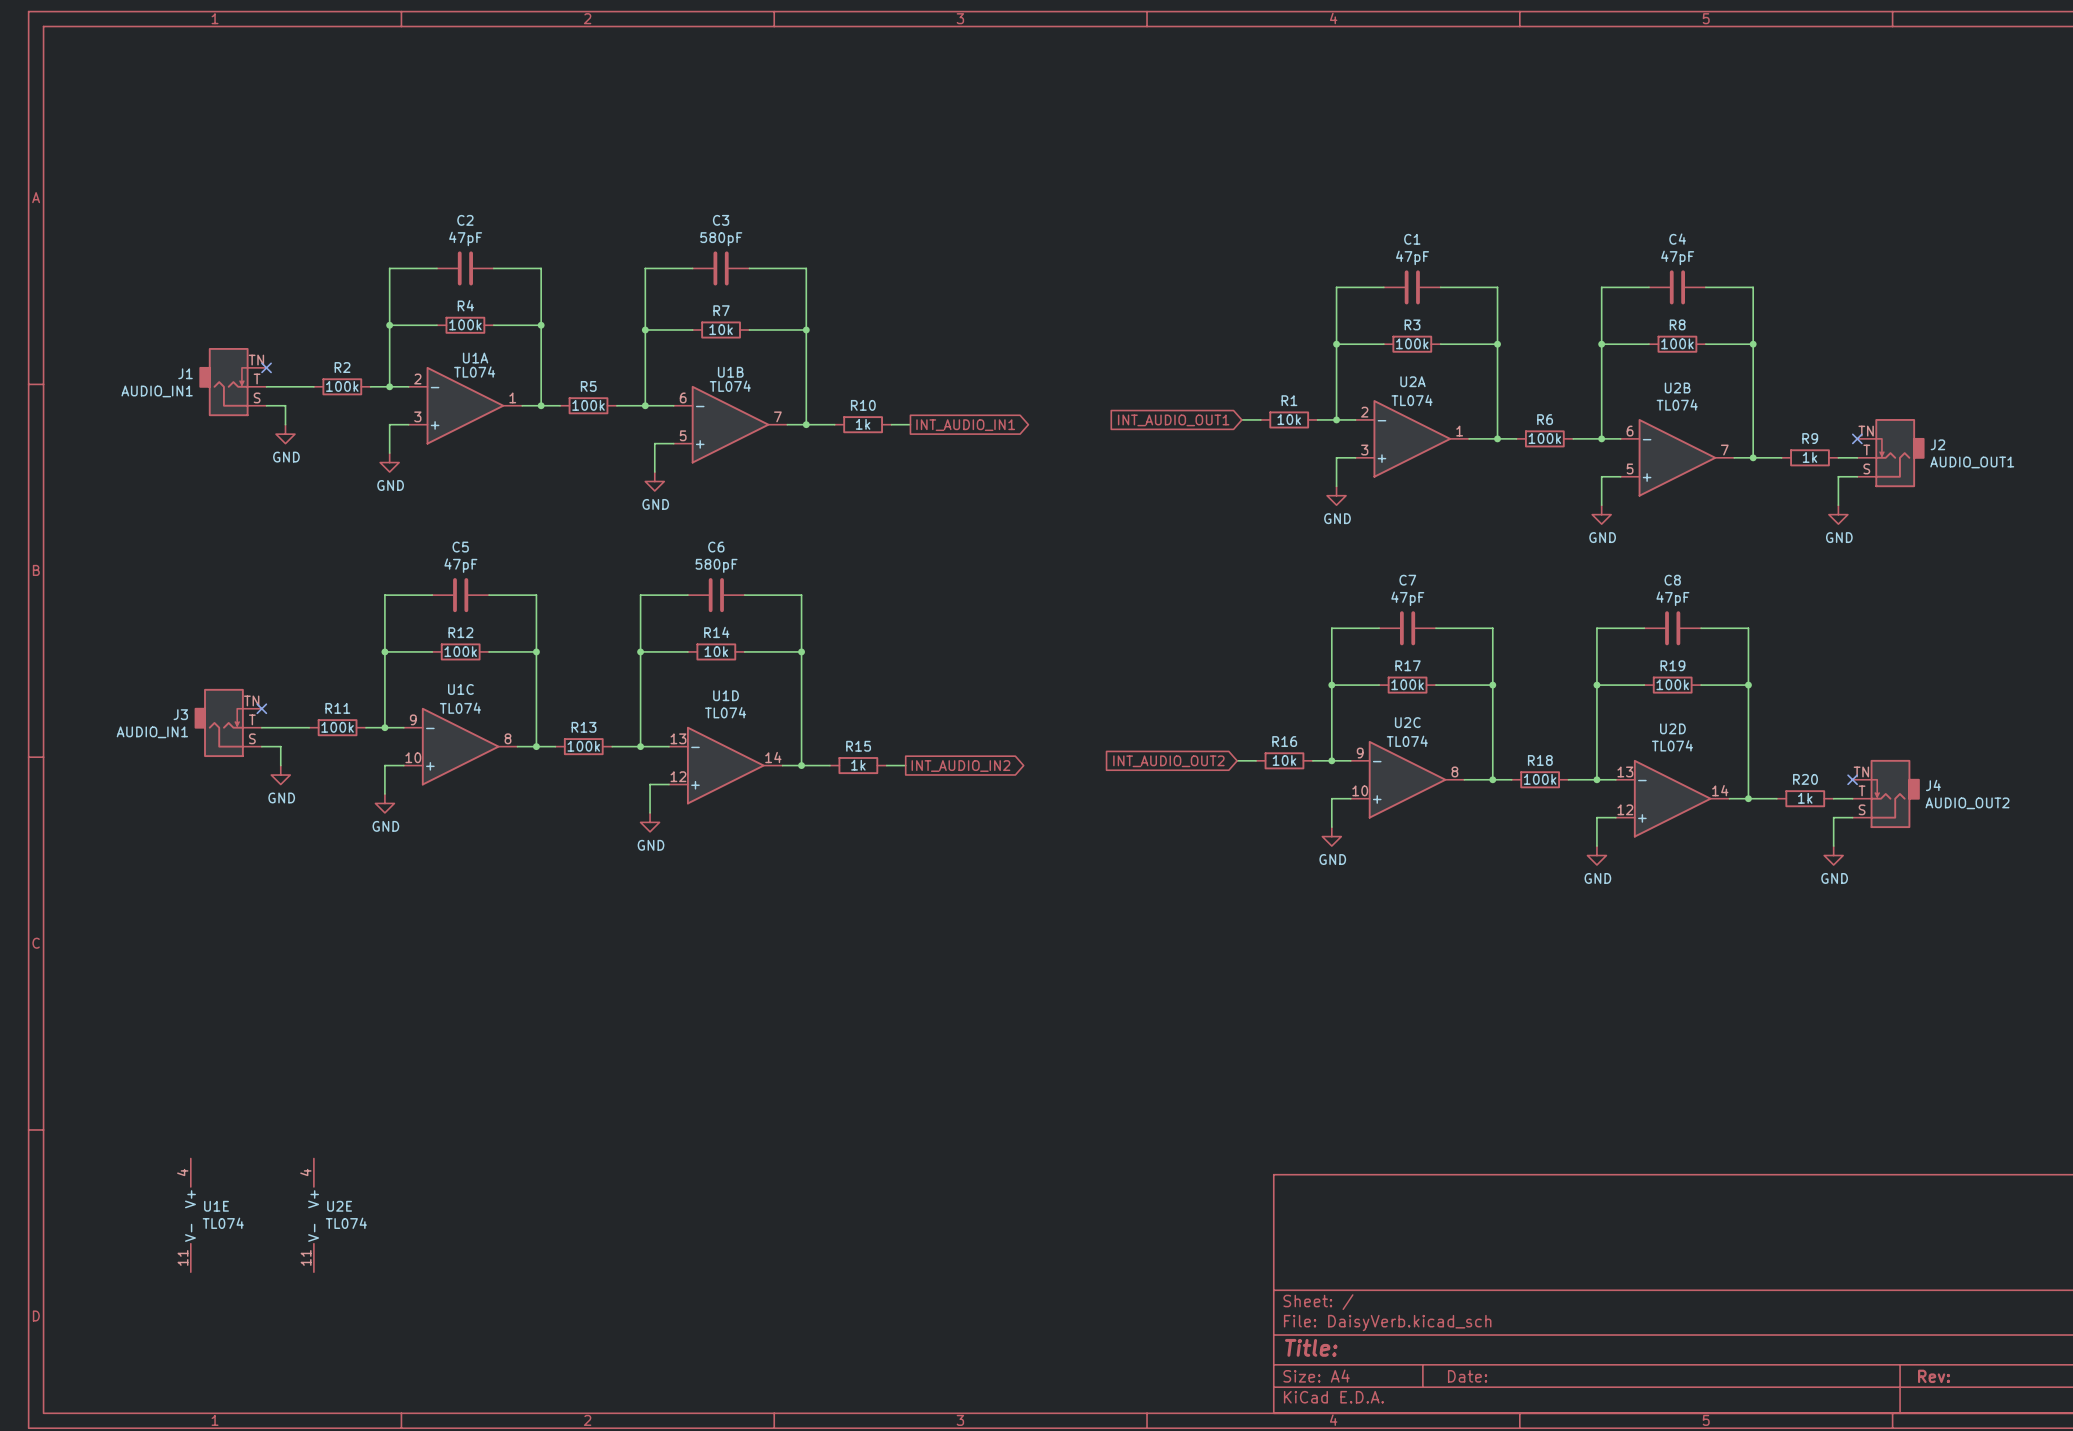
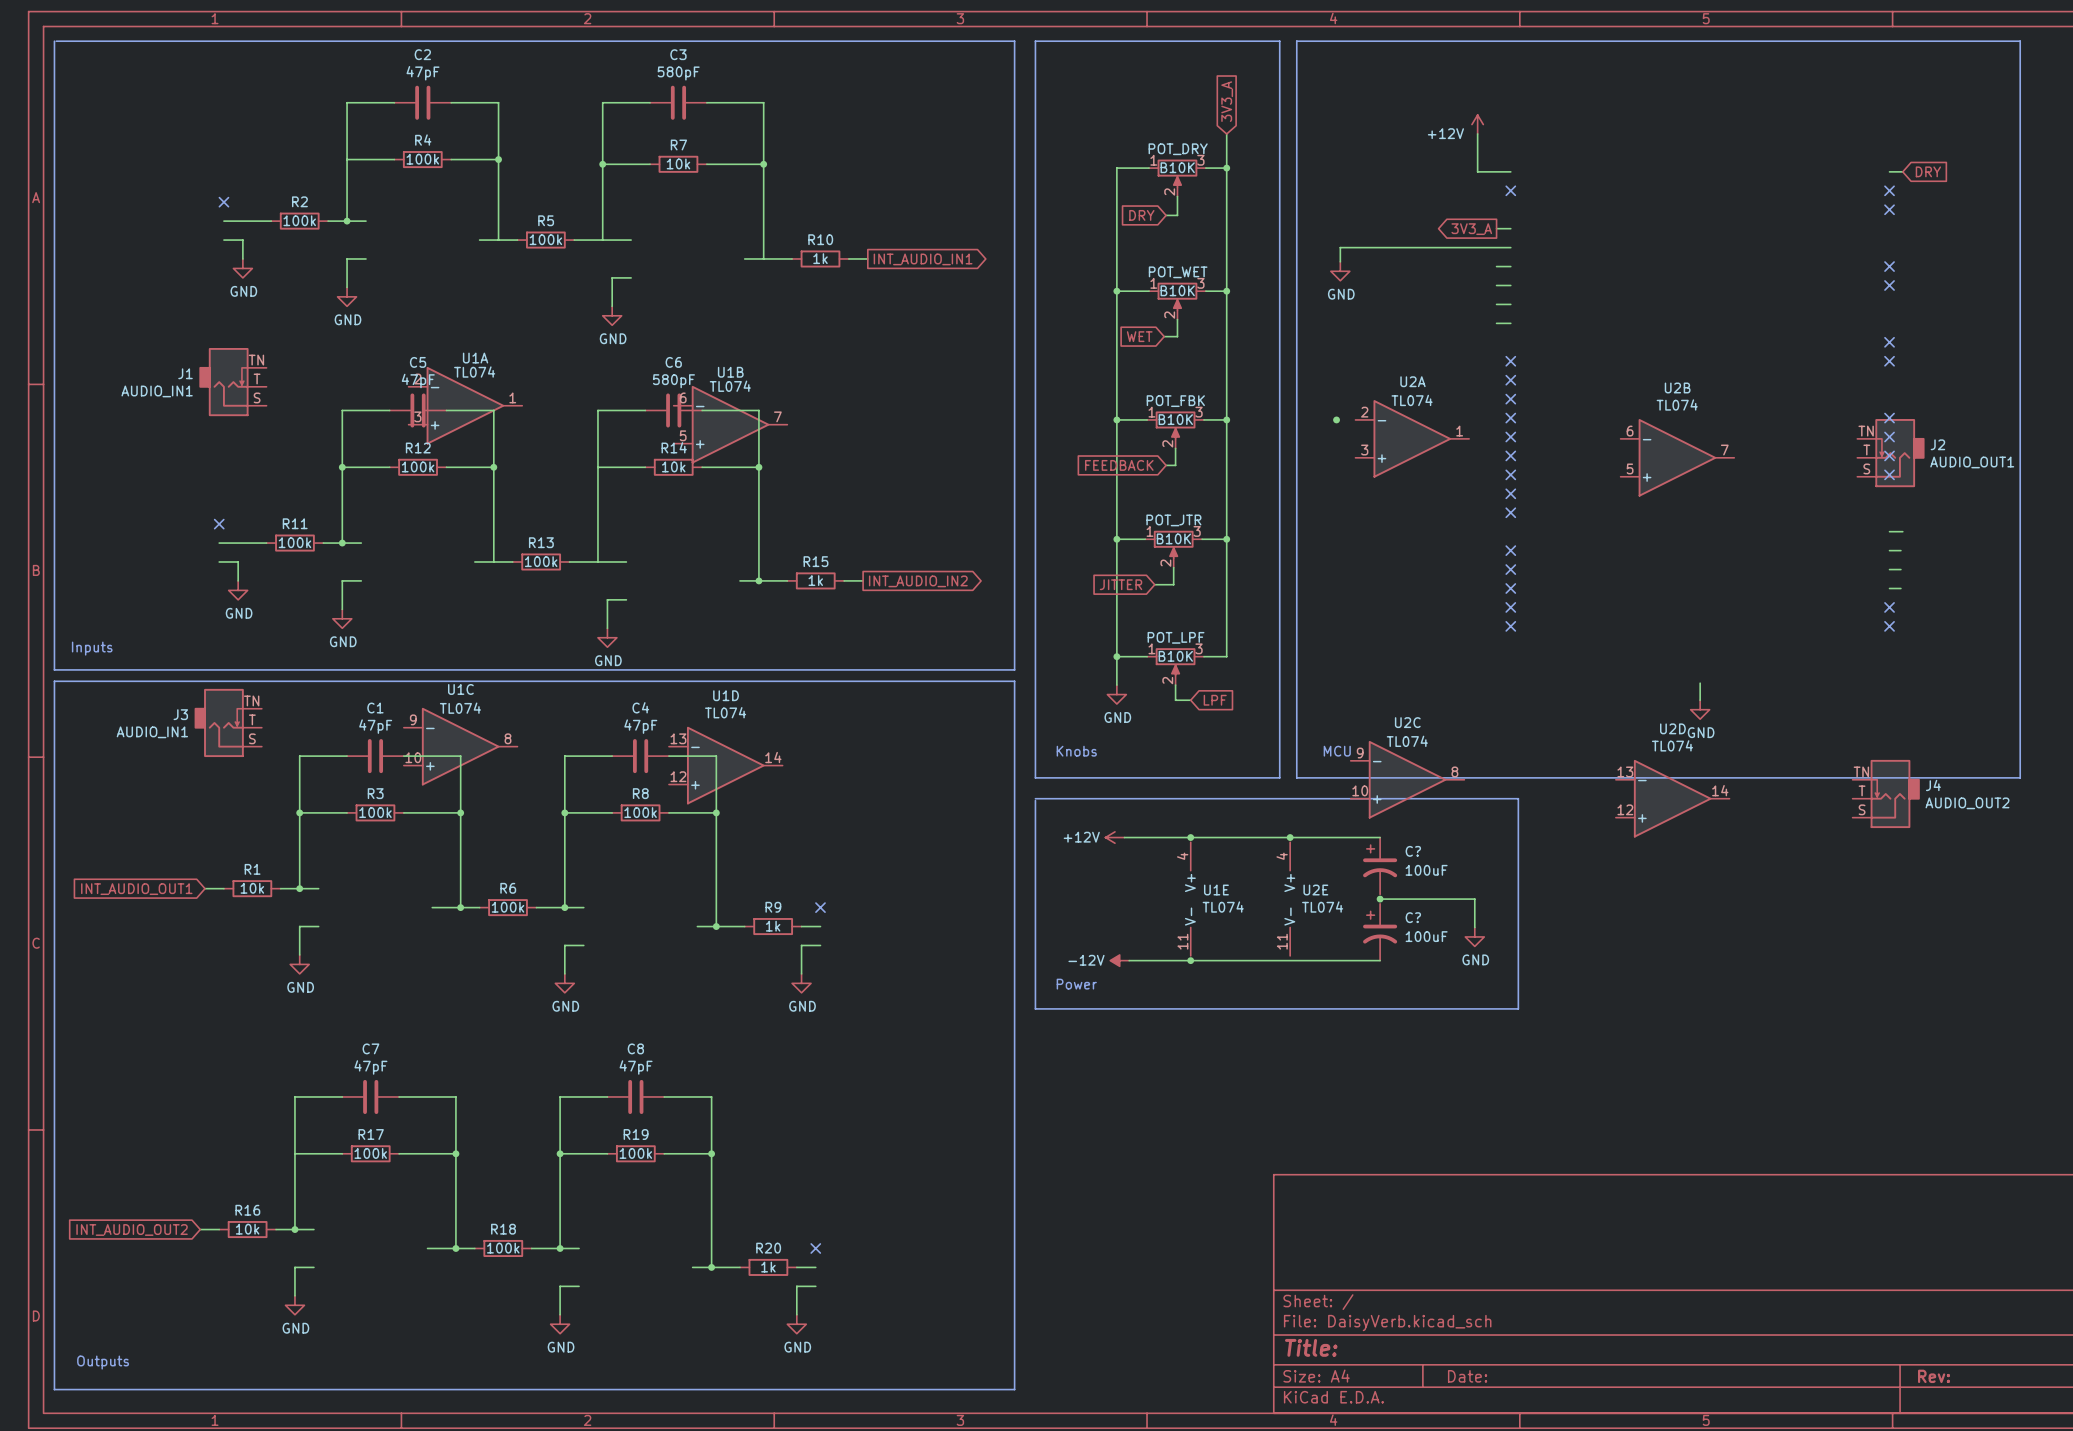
line: none -> (54, 41) (54, 669) (1014, 669) (1014, 41) (56, 41)
line: none -> (1035, 41) (1279, 41) (1279, 777) (1035, 777) (1035, 41)
line: none -> (1296, 41) (2020, 41) (2020, 777) (1296, 777) (1296, 41)
global label: none -> 3V3_A (1227, 101)
power symbol: none -> +12V (1477, 124)
wire: none -> (1226, 133) (1226, 656) (1203, 656)
wire: none -> (1477, 133) (1477, 171) (1510, 171)
junction: none -> (498, 159)
junction: none -> (602, 164)
junction: none -> (763, 164)
wire: none -> (1149, 168) (1116, 168) (1116, 685)
wire: none -> (1205, 168) (1226, 168)
junction: none -> (1226, 168)
wire: none -> (1889, 171) (1902, 171)
global label: none -> DRY (1928, 171)
POT_DRY: none -> B10K (1177, 178)
no-connect mark: none -> (1510, 190)
no-connect mark: none -> (1889, 190)
wire: none -> (1177, 196) (1177, 215) (1166, 215)
no-connect mark: none -> (223, 202)
no-connect mark: none -> (1889, 209)
global label: none -> DRY (1141, 215)
junction: none -> (347, 221)
wire: none -> (1496, 228) (1510, 228)
global label: none -> 3V3_A (1471, 229)
wire: none -> (1510, 247) (1340, 247) (1340, 261)
wire: none -> (1496, 266) (1510, 266)
no-connect mark: none -> (1889, 266)
power symbol: none -> GND (242, 268)
wire: (437, 268) (389, 268) (389, 386) -> (394, 102) (347, 102) (347, 221)
C2 position: (465, 268) -> (422, 102)
wire: (493, 268) (541, 268) (541, 405) -> (451, 102) (498, 102) (498, 240)
wire: (692, 268) (645, 268) (645, 405) -> (650, 102) (602, 102) (602, 240)
C3 position: (721, 268) -> (678, 102)
wire: (749, 268) (806, 268) (806, 424) -> (706, 102) (763, 102) (763, 258)
power symbol: none -> GND (1340, 271)
wire: none -> (1496, 285) (1510, 285)
no-connect mark: none -> (1889, 285)
wire: (1383, 287) (1336, 287) (1336, 419) -> none
C1 position: (1412, 287) -> (375, 756)
wire: (1440, 287) (1497, 287) (1497, 438) -> none
wire: (1649, 287) (1601, 287) (1601, 438) -> none
C4 position: (1677, 287) -> (640, 756)
wire: (1705, 287) (1753, 287) (1753, 457) -> none
wire: none -> (1116, 291) (1149, 291)
junction: none -> (1116, 291)
wire: none -> (1205, 291) (1226, 291)
junction: none -> (1226, 291)
power symbol: none -> GND (347, 296)
POT_WET: none -> B10K (1177, 301)
wire: none -> (1496, 304) (1510, 304)
power symbol: none -> GND (612, 315)
wire: none -> (1177, 319) (1177, 336) (1164, 336)
wire: none -> (1496, 323) (1510, 323)
wire: (389, 325) (437, 325) -> (347, 159) (394, 159)
junction: (389, 325) -> none
R4 position: (465, 325) -> (422, 159)
wire: (493, 325) (541, 325) -> (451, 159) (498, 159)
junction: (541, 325) -> none
wire: (645, 330) (692, 330) -> (602, 164) (650, 164)
junction: (645, 330) -> none
R7 position: (721, 330) -> (678, 164)
wire: (749, 330) (806, 330) -> (706, 164) (763, 164)
junction: (806, 330) -> none
global label: none -> WET (1139, 336)
no-connect mark: none -> (1889, 342)
wire: (1336, 344) (1383, 344) -> none
junction: (1336, 344) -> none
R3 position: (1412, 344) -> (375, 812)
wire: (1440, 344) (1497, 344) -> none
junction: (1497, 344) -> none
wire: (1601, 344) (1649, 344) -> none
junction: (1601, 344) -> none
R8 position: (1677, 344) -> (640, 812)
wire: (1705, 344) (1753, 344) -> none
junction: (1753, 344) -> none
no-connect mark: none -> (1510, 361)
no-connect mark: none -> (1889, 361)
no-connect mark: (266, 367) -> none
no-connect mark: none -> (1510, 380)
wire: (266, 386) (313, 386) -> (223, 221) (271, 221)
R2 position: (342, 386) -> (299, 221)
wire: (370, 386) (408, 386) -> (328, 221) (365, 221)
junction: (389, 386) -> none
no-connect mark: none -> (1510, 399)
wire: (266, 405) (285, 405) (285, 424) -> (223, 240) (242, 240) (242, 258)
wire: (522, 405) (560, 405) -> (479, 240) (517, 240)
junction: (541, 405) -> none
R5 position: (588, 405) -> (545, 240)
wire: (616, 405) (673, 405) -> (574, 240) (631, 240)
junction: (645, 405) -> none
wire: none -> (389, 410) (342, 410) (342, 543)
wire: none -> (446, 410) (493, 410) (493, 561)
wire: none -> (645, 410) (597, 410) (597, 561)
wire: none -> (702, 410) (758, 410) (758, 580)
no-connect mark: none -> (1510, 418)
no-connect mark: none -> (1889, 418)
wire: none -> (1116, 419) (1147, 419)
junction: none -> (1116, 419)
wire: none -> (1203, 419) (1226, 419)
junction: none -> (1226, 419)
wire: (1241, 419) (1260, 419) -> none
R1 position: (1289, 419) -> (252, 888)
wire: (1317, 419) (1355, 419) -> none
global label: INT_AUDIO_OUT1 (1173, 420) -> none
wire: (408, 424) (389, 424) (389, 453) -> (365, 258) (347, 258) (347, 287)
wire: (787, 424) (834, 424) -> (744, 258) (792, 258)
junction: (806, 424) -> none
R10 position: (863, 424) -> (820, 258)
wire: (891, 424) (910, 424) -> (848, 258) (867, 258)
global label position: INT_AUDIO_IN1 (965, 425) -> INT_AUDIO_IN1 (923, 259)
POT_FBK: none -> B10K (1175, 429)
power symbol: GND (285, 434) -> none
no-connect mark: none -> (1510, 437)
no-connect mark: none -> (1889, 437)
wire: (1469, 438) (1516, 438) -> none
junction: (1497, 438) -> none
R6 position: (1544, 438) -> (508, 907)
wire: (1573, 438) (1620, 438) -> none
junction: (1601, 438) -> none
no-connect mark: (1857, 438) -> none
wire: (673, 443) (654, 443) (654, 472) -> (631, 277) (612, 277) (612, 306)
wire: none -> (1175, 448) (1175, 465) (1166, 465)
no-connect mark: none -> (1510, 455)
no-connect mark: none -> (1889, 455)
wire: (1355, 457) (1336, 457) (1336, 486) -> none
wire: (1734, 457) (1781, 457) -> none
junction: (1753, 457) -> none
R9 position: (1809, 457) -> (773, 926)
wire: (1838, 457) (1857, 457) -> none
power symbol: GND (389, 462) -> none
global label: none -> FEEDBACK (1119, 465)
wire: none -> (342, 467) (389, 467)
junction: none -> (342, 467)
wire: none -> (446, 467) (493, 467)
junction: none -> (493, 467)
wire: none -> (597, 467) (645, 467)
wire: none -> (702, 467) (758, 467)
junction: none -> (758, 467)
no-connect mark: none -> (1510, 474)
no-connect mark: none -> (1889, 474)
wire: (1620, 476) (1601, 476) (1601, 505) -> none
wire: (1857, 476) (1838, 476) (1838, 505) -> none
power symbol: GND (654, 481) -> none
no-connect mark: none -> (1510, 493)
power symbol: GND (1336, 495) -> none
no-connect mark: none -> (1510, 512)
power symbol: GND (1601, 514) -> none
power symbol: GND (1838, 514) -> none
no-connect mark: none -> (219, 524)
wire: none -> (1889, 531) (1902, 531)
wire: none -> (1116, 539) (1145, 539)
junction: none -> (1116, 539)
wire: none -> (1202, 539) (1226, 539)
junction: none -> (1226, 539)
wire: none -> (219, 543) (266, 543)
wire: none -> (323, 543) (361, 543)
junction: none -> (342, 543)
POT_JTR: none -> B10K (1173, 549)
no-connect mark: none -> (1510, 550)
wire: none -> (1889, 550) (1900, 550)
wire: none -> (219, 561) (238, 561) (238, 580)
wire: none -> (474, 561) (512, 561)
wire: none -> (569, 561) (626, 561)
wire: none -> (1173, 567) (1173, 584) (1154, 584)
no-connect mark: none -> (1510, 569)
wire: none -> (1889, 569) (1900, 569)
wire: none -> (361, 580) (342, 580) (342, 609)
junction: none -> (758, 580)
wire: none -> (844, 580) (863, 580)
global label: none -> INT_AUDIO_IN2 (918, 581)
global label: none -> JITTER (1121, 584)
no-connect mark: none -> (1510, 588)
wire: none -> (1889, 588) (1900, 588)
power symbol: none -> GND (238, 590)
wire: (432, 595) (384, 595) (384, 727) -> (347, 756) (299, 756) (299, 888)
C5 position: (460, 595) -> (418, 410)
wire: (489, 595) (536, 595) (536, 746) -> none
wire: (687, 595) (640, 595) (640, 746) -> none
C6 position: (716, 595) -> (673, 410)
wire: (744, 595) (801, 595) (801, 765) -> none
wire: none -> (626, 599) (607, 599) (607, 628)
no-connect mark: none -> (1510, 607)
no-connect mark: none -> (1889, 607)
power symbol: none -> GND (342, 618)
no-connect mark: none -> (1510, 626)
no-connect mark: none -> (1889, 626)
wire: (1379, 628) (1331, 628) (1331, 760) -> none
C7 position: (1407, 628) -> (370, 1096)
wire: (1435, 628) (1492, 628) (1492, 779) -> none
wire: (1644, 628) (1596, 628) (1596, 779) -> none
C8 position: (1672, 628) -> (635, 1096)
wire: (1701, 628) (1748, 628) (1748, 798) -> none
power symbol: none -> GND (607, 637)
text: none -> Inputs (92, 648)
wire: (384, 651) (432, 651) -> (299, 812) (347, 812)
junction: (384, 651) -> none
R12 position: (460, 651) -> (418, 467)
wire: (489, 651) (536, 651) -> (564, 812) (612, 812)
junction: (536, 651) -> none
wire: (640, 651) (687, 651) -> (740, 580) (787, 580)
junction: (640, 651) -> none
R14 position: (716, 651) -> (673, 467)
wire: (744, 651) (801, 651) -> none
junction: (801, 651) -> none
wire: none -> (1116, 656) (1147, 656)
junction: none -> (1116, 656)
POT_LPF: none -> B10K (1175, 666)
line: none -> (54, 681) (1014, 681) (1014, 1389) (54, 1389) (54, 681)
wire: none -> (1700, 683) (1700, 700)
wire: none -> (1175, 685) (1175, 700) (1190, 700)
wire: (1331, 685) (1379, 685) -> none
junction: (1331, 685) -> none
R17 position: (1407, 685) -> (370, 1153)
wire: (1435, 685) (1492, 685) -> none
junction: (1492, 685) -> none
wire: (1596, 685) (1644, 685) -> none
junction: (1596, 685) -> none
R19 position: (1672, 685) -> (635, 1153)
wire: (1701, 685) (1748, 685) -> none
junction: (1748, 685) -> none
power symbol: none -> GND (1116, 694)
global label: none -> LPF (1215, 700)
no-connect mark: (261, 708) -> none
power symbol: none -> GND (1700, 709)
wire: (261, 727) (309, 727) -> none
R11 position: (337, 727) -> (294, 543)
wire: (365, 727) (403, 727) -> (280, 888) (318, 888)
junction: (384, 727) -> none
wire: (261, 746) (280, 746) (280, 765) -> none
wire: (517, 746) (555, 746) -> none
junction: (536, 746) -> none
R13 position: (583, 746) -> (541, 561)
wire: (612, 746) (668, 746) -> none
junction: (640, 746) -> none
text: none -> Knobs (1076, 751)
text: none -> MCU (1337, 751)
wire: none -> (403, 756) (460, 756) (460, 907)
wire: none -> (612, 756) (564, 756) (564, 812)
wire: none -> (668, 756) (716, 756) (716, 926)
wire: (1237, 760) (1256, 760) -> none
R16 position: (1284, 760) -> (247, 1229)
wire: (1312, 760) (1350, 760) -> none
junction: (1331, 760) -> none
global label: INT_AUDIO_OUT2 (1168, 761) -> none
wire: (403, 765) (384, 765) (384, 793) -> (318, 926) (299, 926) (299, 954)
wire: (782, 765) (829, 765) -> (697, 926) (744, 926)
junction: (801, 765) -> none
R15 position: (858, 765) -> (815, 580)
wire: (886, 765) (905, 765) -> (801, 926) (820, 926)
global label: INT_AUDIO_IN2 (960, 766) -> none
power symbol: GND (280, 775) -> none
wire: (1464, 779) (1511, 779) -> none
junction: (1492, 779) -> none
R18 position: (1540, 779) -> (503, 1248)
wire: (1568, 779) (1615, 779) -> none
junction: (1596, 779) -> none
no-connect mark: (1852, 779) -> none
wire: (668, 784) (650, 784) (650, 812) -> (583, 945) (564, 945) (564, 973)
line: none -> (1035, 798) (1518, 798) (1518, 1008) (1035, 1008) (1035, 800)
wire: (1350, 798) (1331, 798) (1331, 827) -> none
wire: (1729, 798) (1776, 798) -> none
junction: (1748, 798) -> none
R20 position: (1805, 798) -> (768, 1267)
wire: (1833, 798) (1852, 798) -> none
power symbol: GND (384, 803) -> none
junction: none -> (299, 812)
wire: none -> (403, 812) (460, 812)
junction: none -> (460, 812)
wire: none -> (564, 812) (564, 907)
junction: none -> (564, 812)
wire: none -> (668, 812) (716, 812)
junction: none -> (716, 812)
wire: (1615, 817) (1596, 817) (1596, 846) -> none
wire: (1852, 817) (1833, 817) (1833, 846) -> none
power symbol: GND (650, 822) -> none
power symbol: GND (1331, 836) -> none
power symbol: none -> +12V (1114, 837)
wire: none -> (1124, 837) (1380, 837)
junction: none -> (1190, 837)
junction: none -> (1290, 837)
power symbol: GND (1596, 855) -> none
power symbol: GND (1833, 855) -> none
C?: none -> 100uF (1380, 865)
wire: none -> (205, 888) (223, 888)
junction: none -> (299, 888)
global label: none -> INT_AUDIO_OUT1 (136, 889)
wire: none -> (1380, 899) (1474, 899) (1474, 927)
junction: none -> (1380, 899)
wire: none -> (432, 907) (479, 907)
junction: none -> (460, 907)
wire: none -> (536, 907) (583, 907)
junction: none -> (564, 907)
no-connect mark: none -> (820, 907)
junction: none -> (716, 926)
C?: none -> 100uF (1380, 932)
power symbol: none -> GND (1474, 936)
wire: none -> (820, 945) (801, 945) (801, 973)
power symbol: none -> -12V (1119, 960)
wire: none -> (1129, 960) (1380, 960)
junction: none -> (1190, 960)
power symbol: none -> GND (299, 964)
power symbol: none -> GND (564, 983)
power symbol: none -> GND (801, 983)
text: none -> Power (1076, 984)
wire: none -> (342, 1096) (294, 1096) (294, 1229)
wire: none -> (399, 1096) (455, 1096) (455, 1248)
wire: none -> (607, 1096) (560, 1096) (560, 1248)
wire: none -> (664, 1096) (711, 1096) (711, 1267)
wire: none -> (294, 1153) (342, 1153)
wire: none -> (399, 1153) (455, 1153)
junction: none -> (455, 1153)
wire: none -> (560, 1153) (607, 1153)
junction: none -> (560, 1153)
wire: none -> (664, 1153) (711, 1153)
junction: none -> (711, 1153)
U1E position: (190, 1215) -> (1190, 899)
U2E position: (313, 1215) -> (1290, 899)
wire: none -> (200, 1229) (219, 1229)
wire: none -> (276, 1229) (313, 1229)
junction: none -> (294, 1229)
global label: none -> INT_AUDIO_OUT2 (132, 1230)
wire: none -> (427, 1248) (474, 1248)
junction: none -> (455, 1248)
wire: none -> (531, 1248) (579, 1248)
junction: none -> (560, 1248)
no-connect mark: none -> (815, 1248)
wire: none -> (313, 1267) (294, 1267) (294, 1295)
wire: none -> (692, 1267) (740, 1267)
junction: none -> (711, 1267)
wire: none -> (796, 1267) (815, 1267)
wire: none -> (579, 1286) (560, 1286) (560, 1314)
wire: none -> (815, 1286) (796, 1286) (796, 1314)
power symbol: none -> GND (294, 1305)
power symbol: none -> GND (560, 1324)
power symbol: none -> GND (796, 1324)
text: none -> Outputs (103, 1362)

